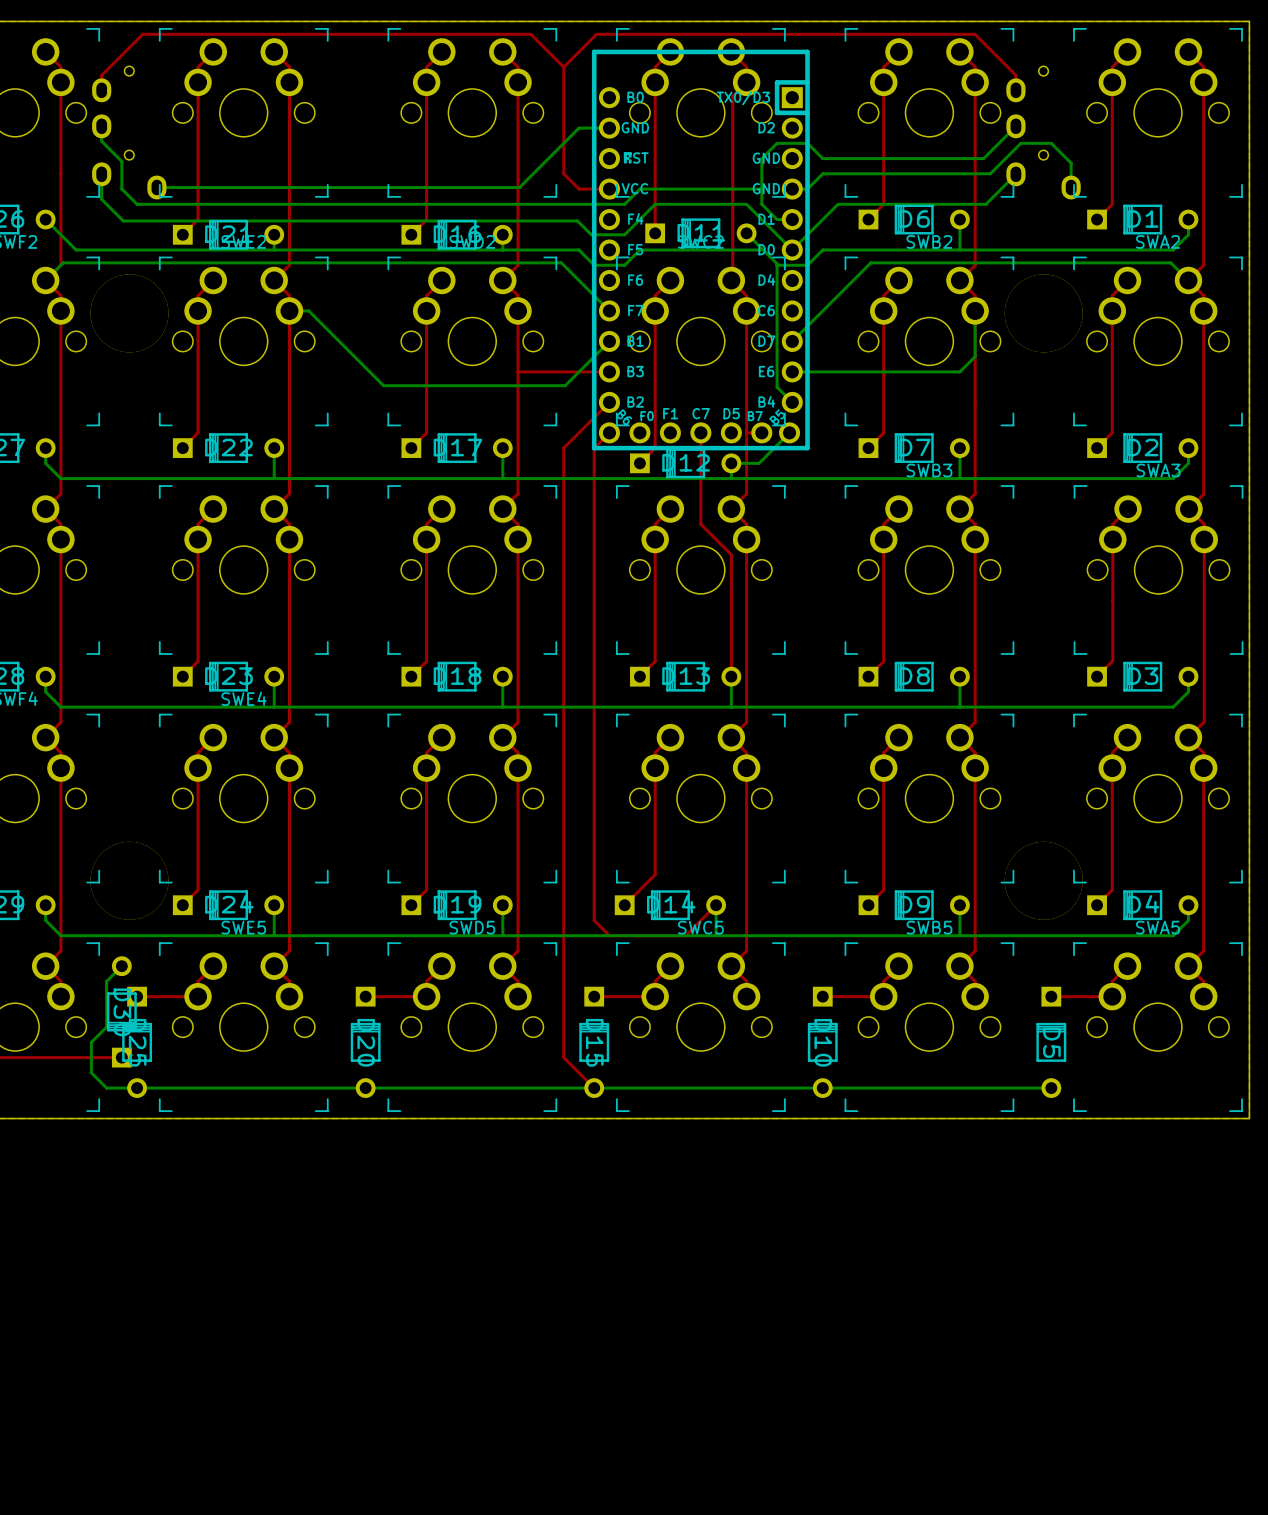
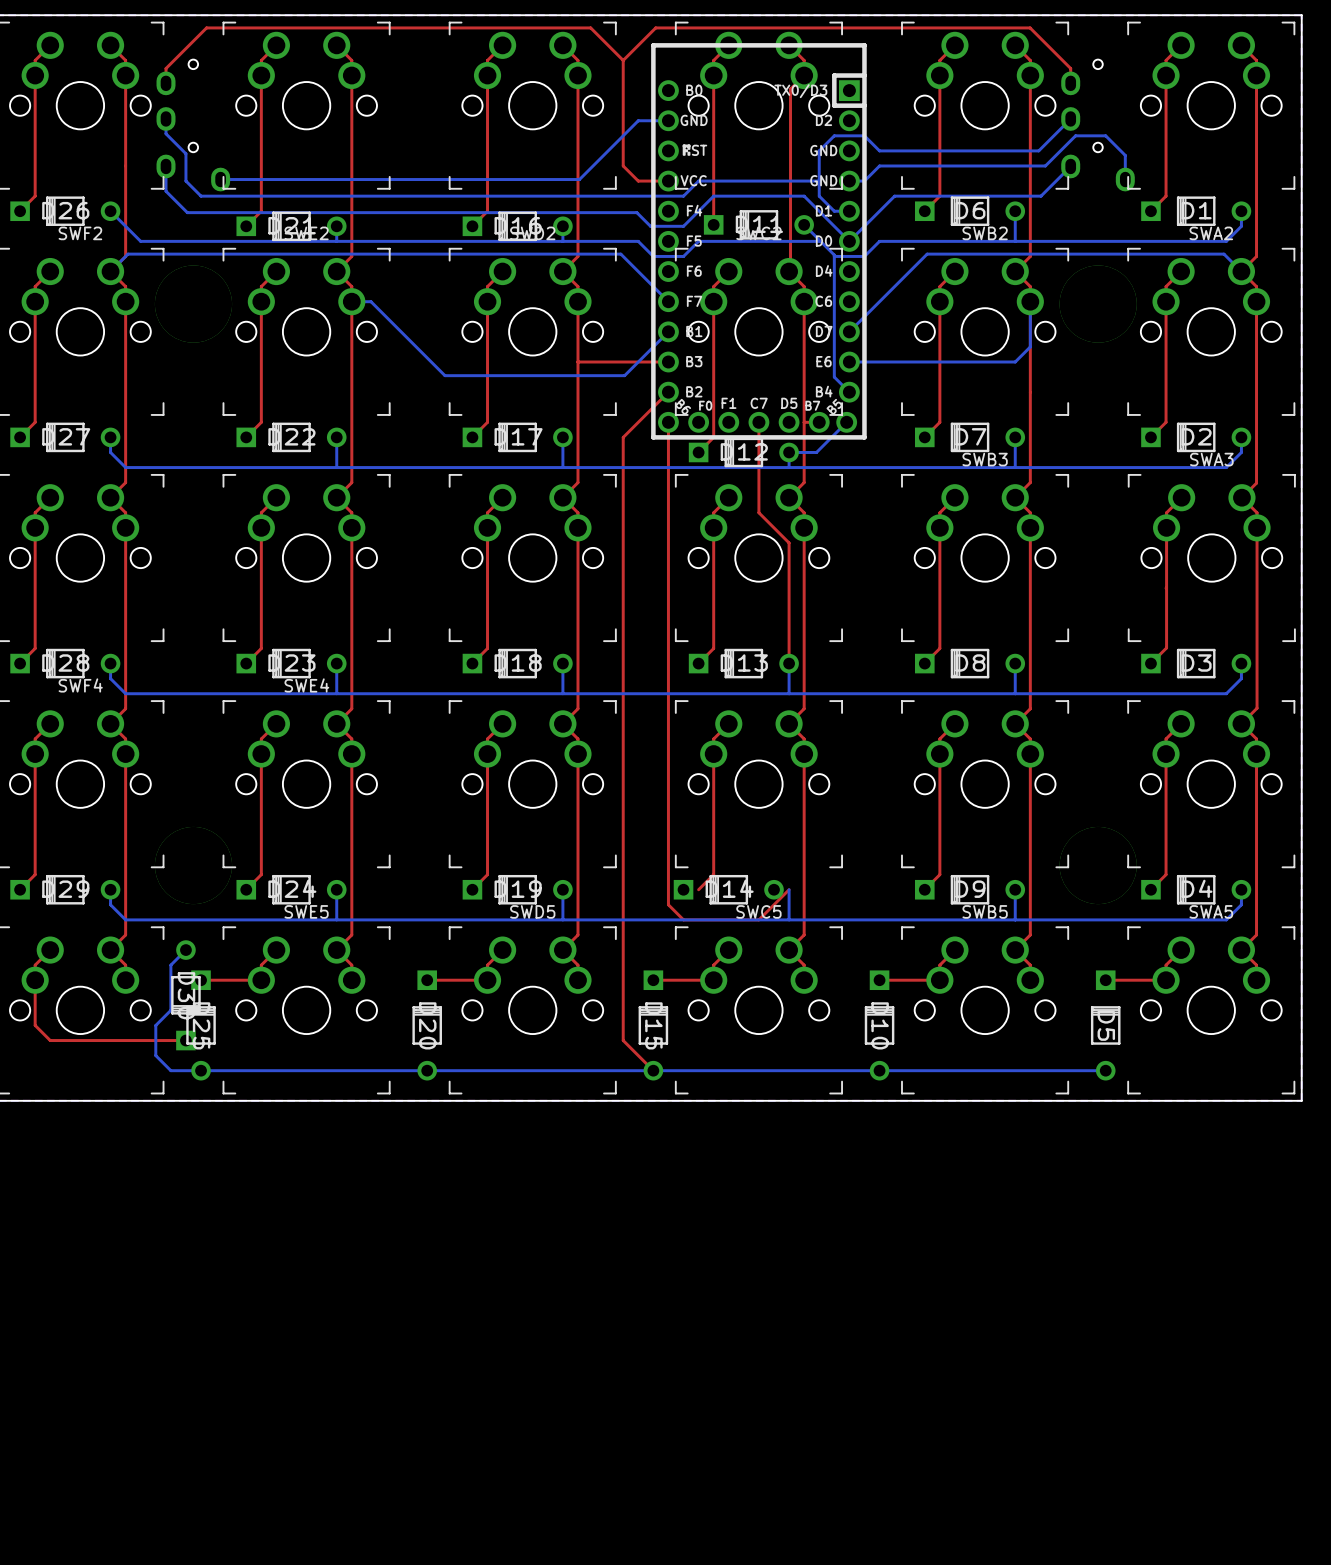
top track: (609, 432) (594, 448) (594, 920) (609, 935) (624, 935) -> (668, 422) (668, 904) (683, 919)
top track: (655, 874) (624, 905) -> (713, 859) (713, 874) (698, 889)
top track: (716, 905) (685, 935) -> (789, 889) (758, 919) (743, 919)
bottom track: (716, 905) (716, 935) -> (789, 889) (789, 919)

